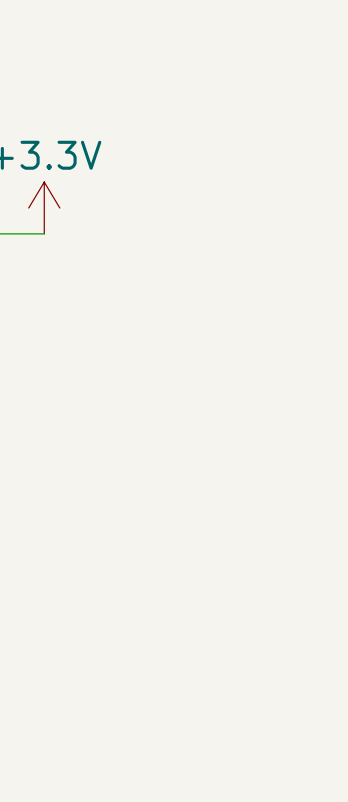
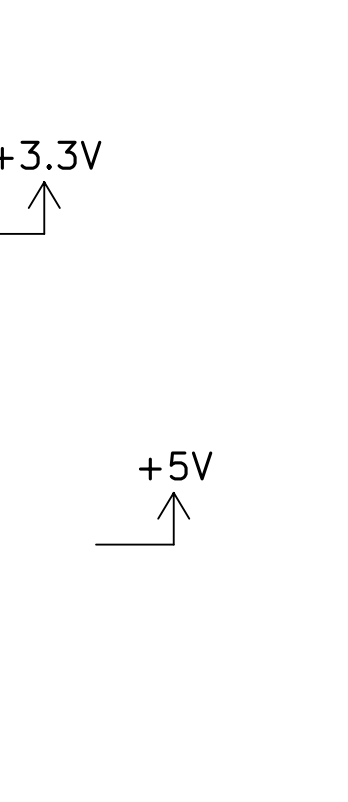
power symbol: none -> +5V (173, 518)
wire: none -> (96, 544) (173, 544)

